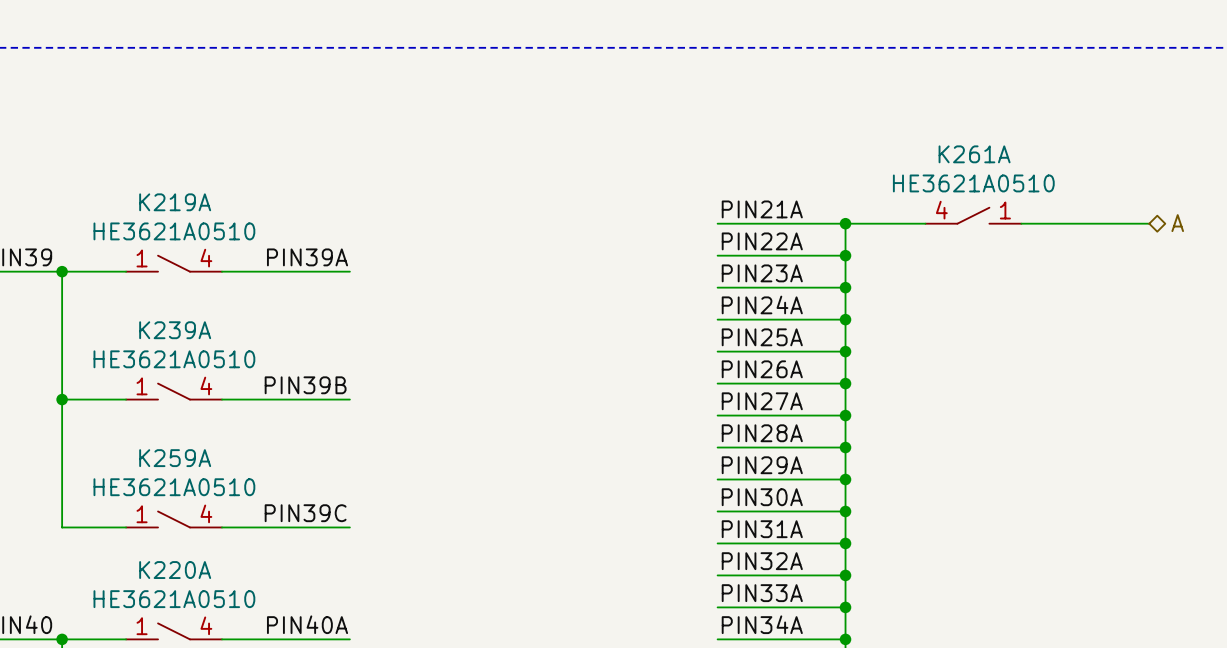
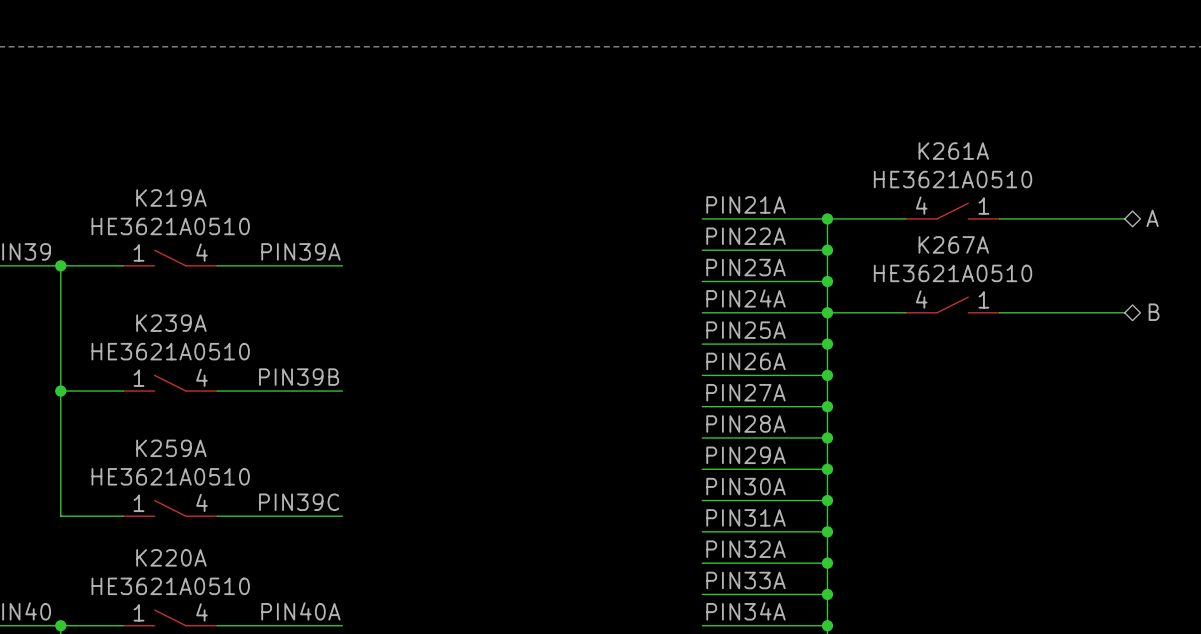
K267A: none -> HE3621A0510 (952, 304)
wire: none -> (827, 312) (905, 312)
wire: none -> (999, 312) (1124, 312)
hierarchical label: none -> B (1154, 312)

